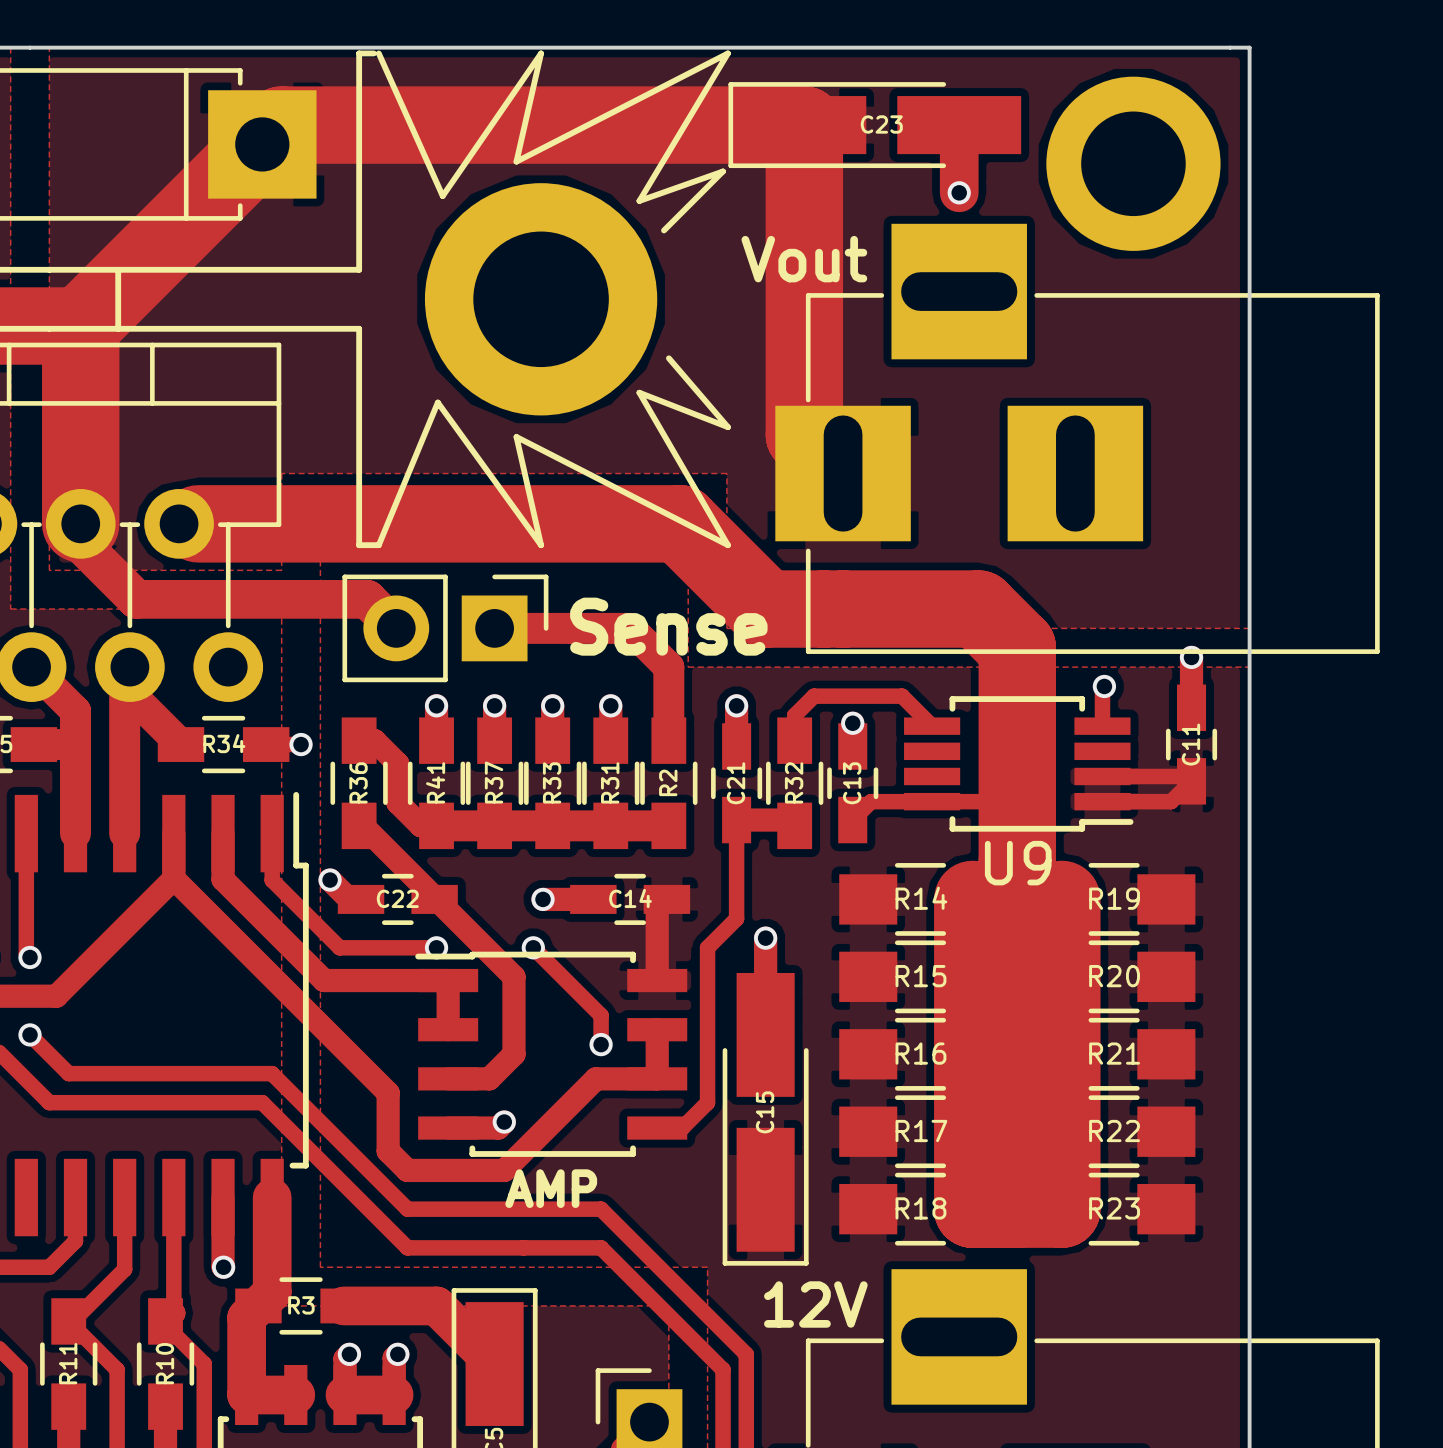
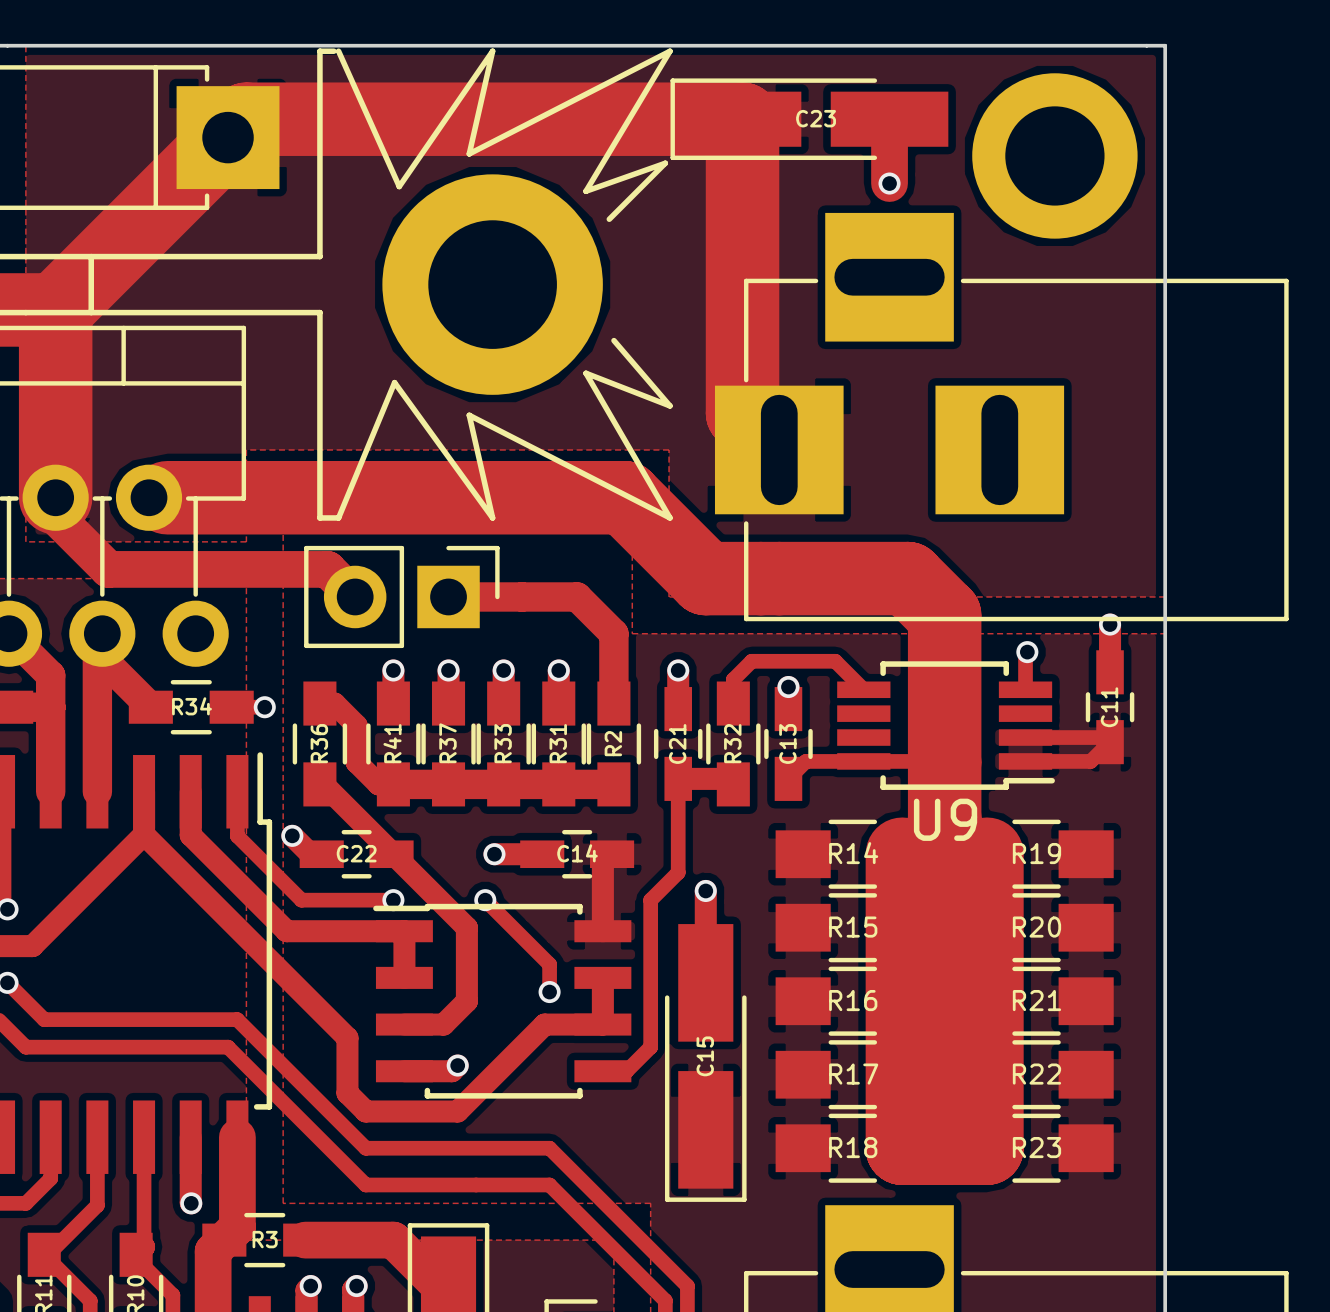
text: Vout (804, 259) -> none
text: Sense (668, 626) -> none
text: AMP (551, 1188) -> none
text: 12V (815, 1304) -> none

